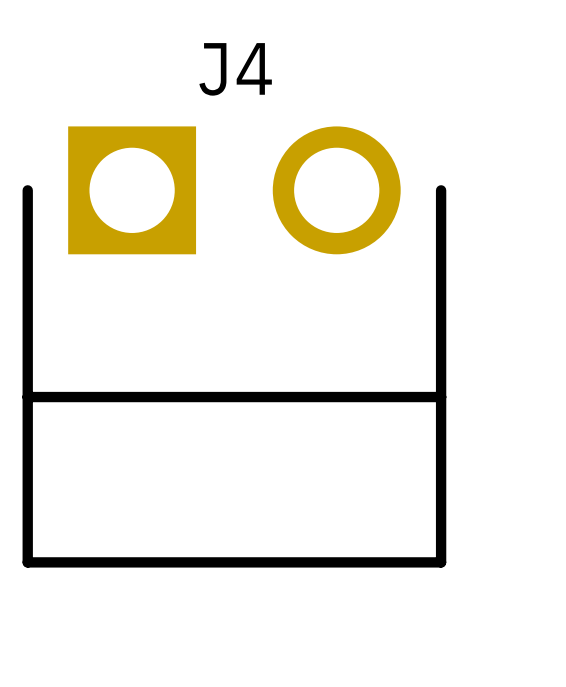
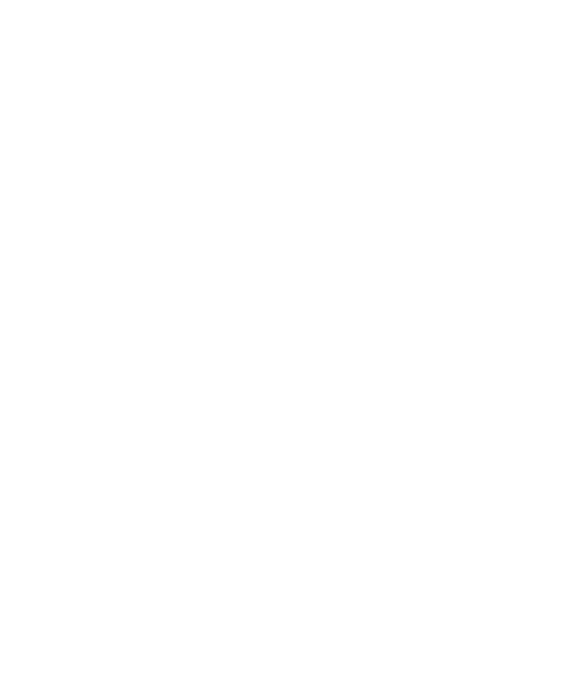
J4: (234, 346) -> none

